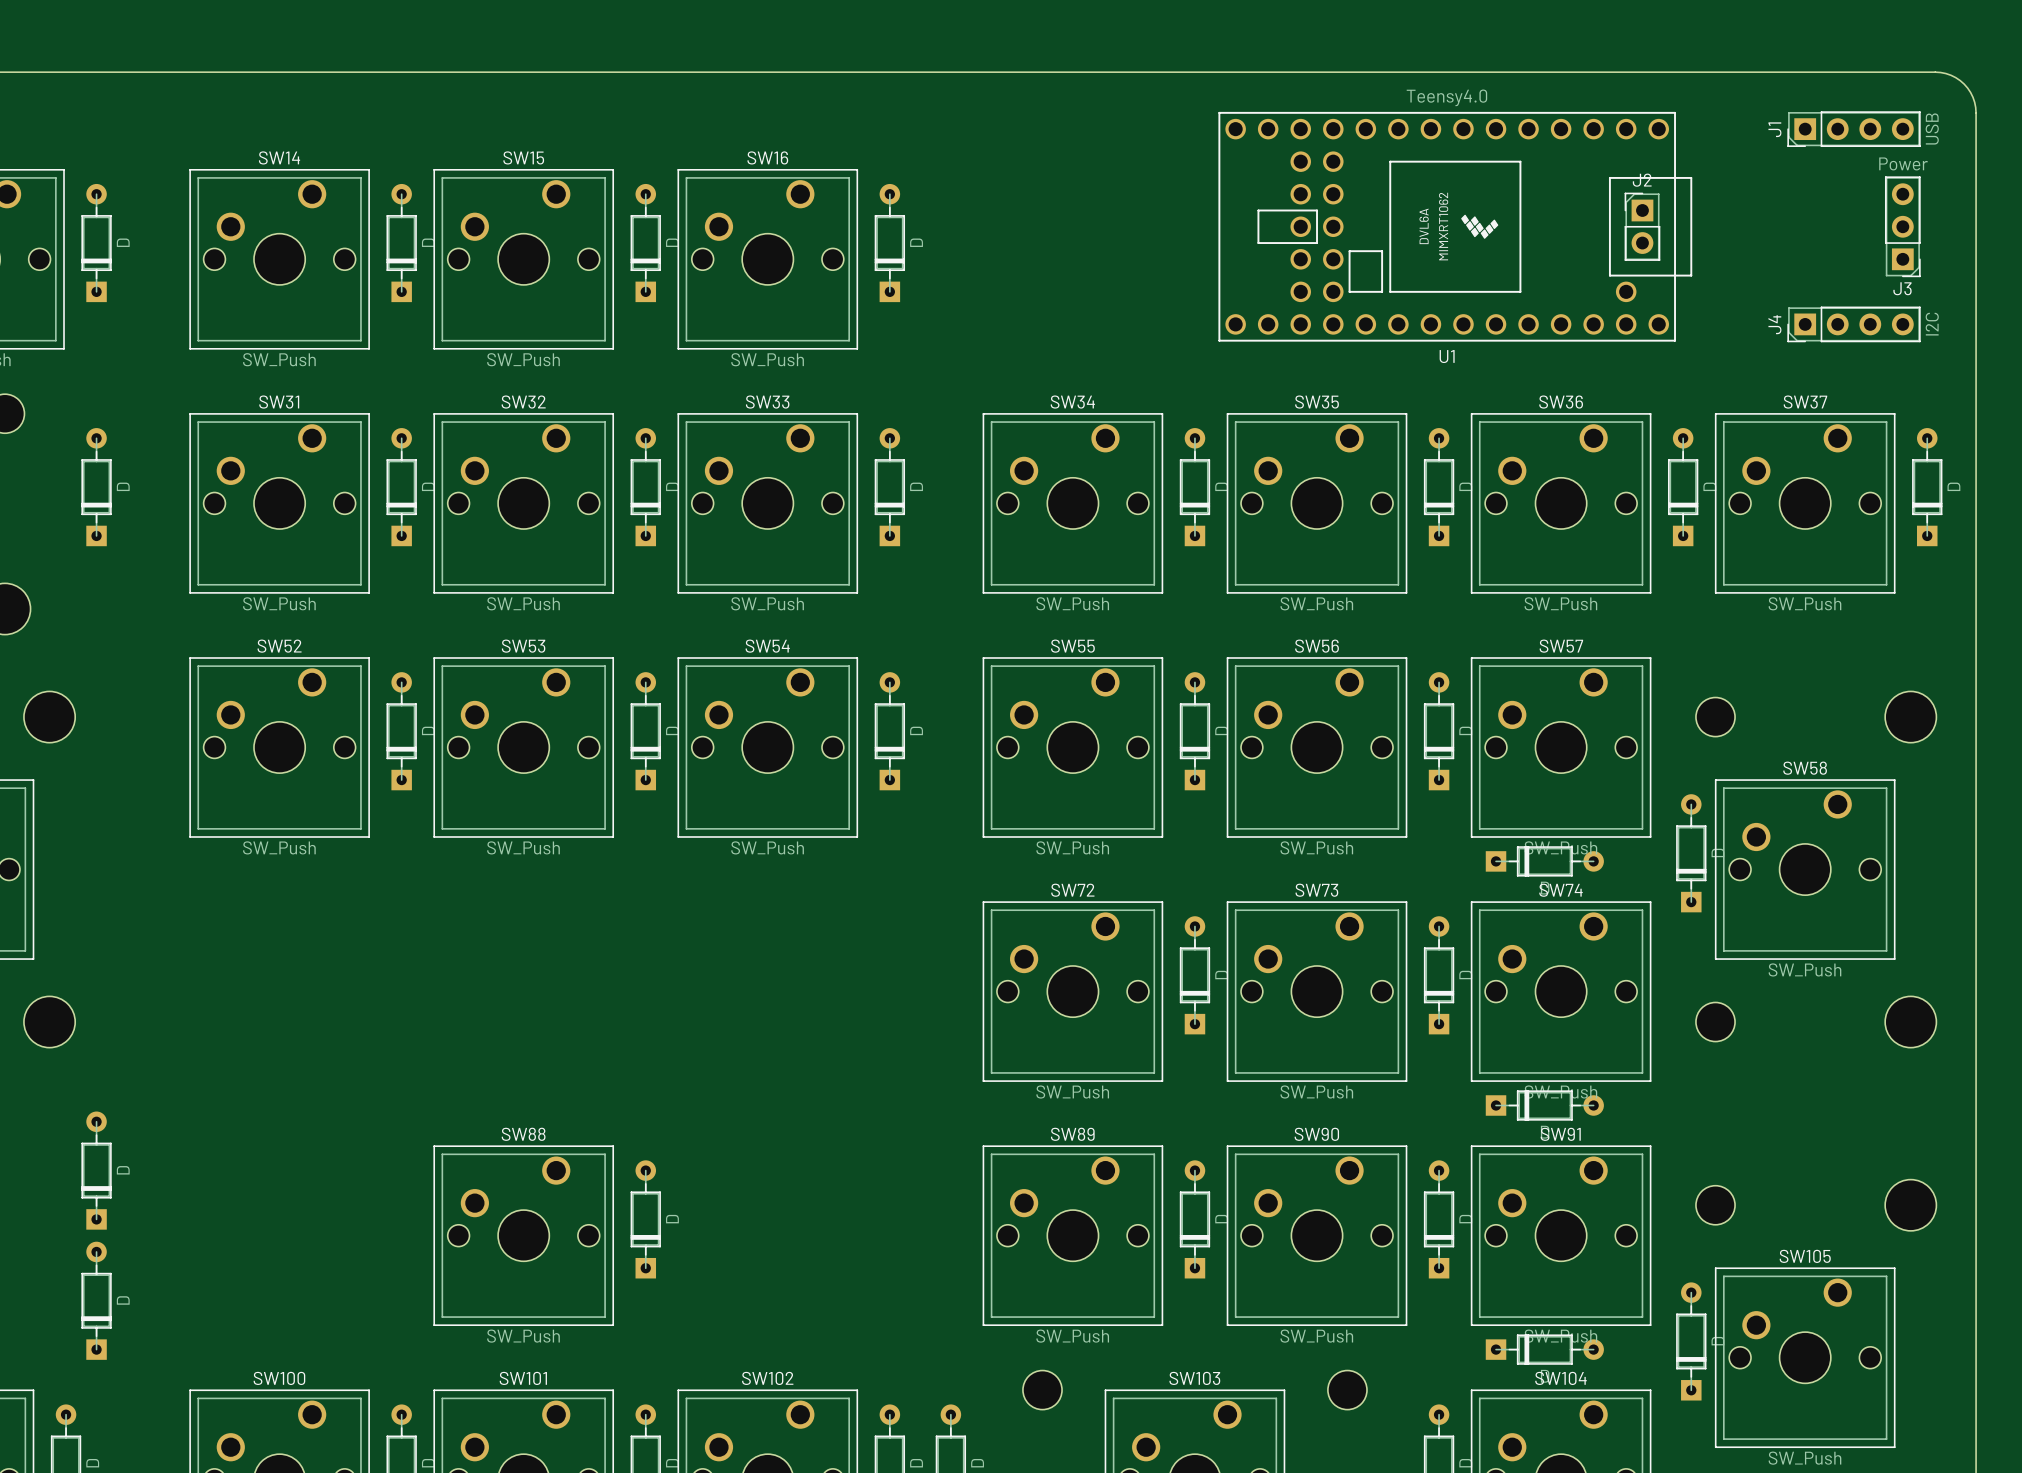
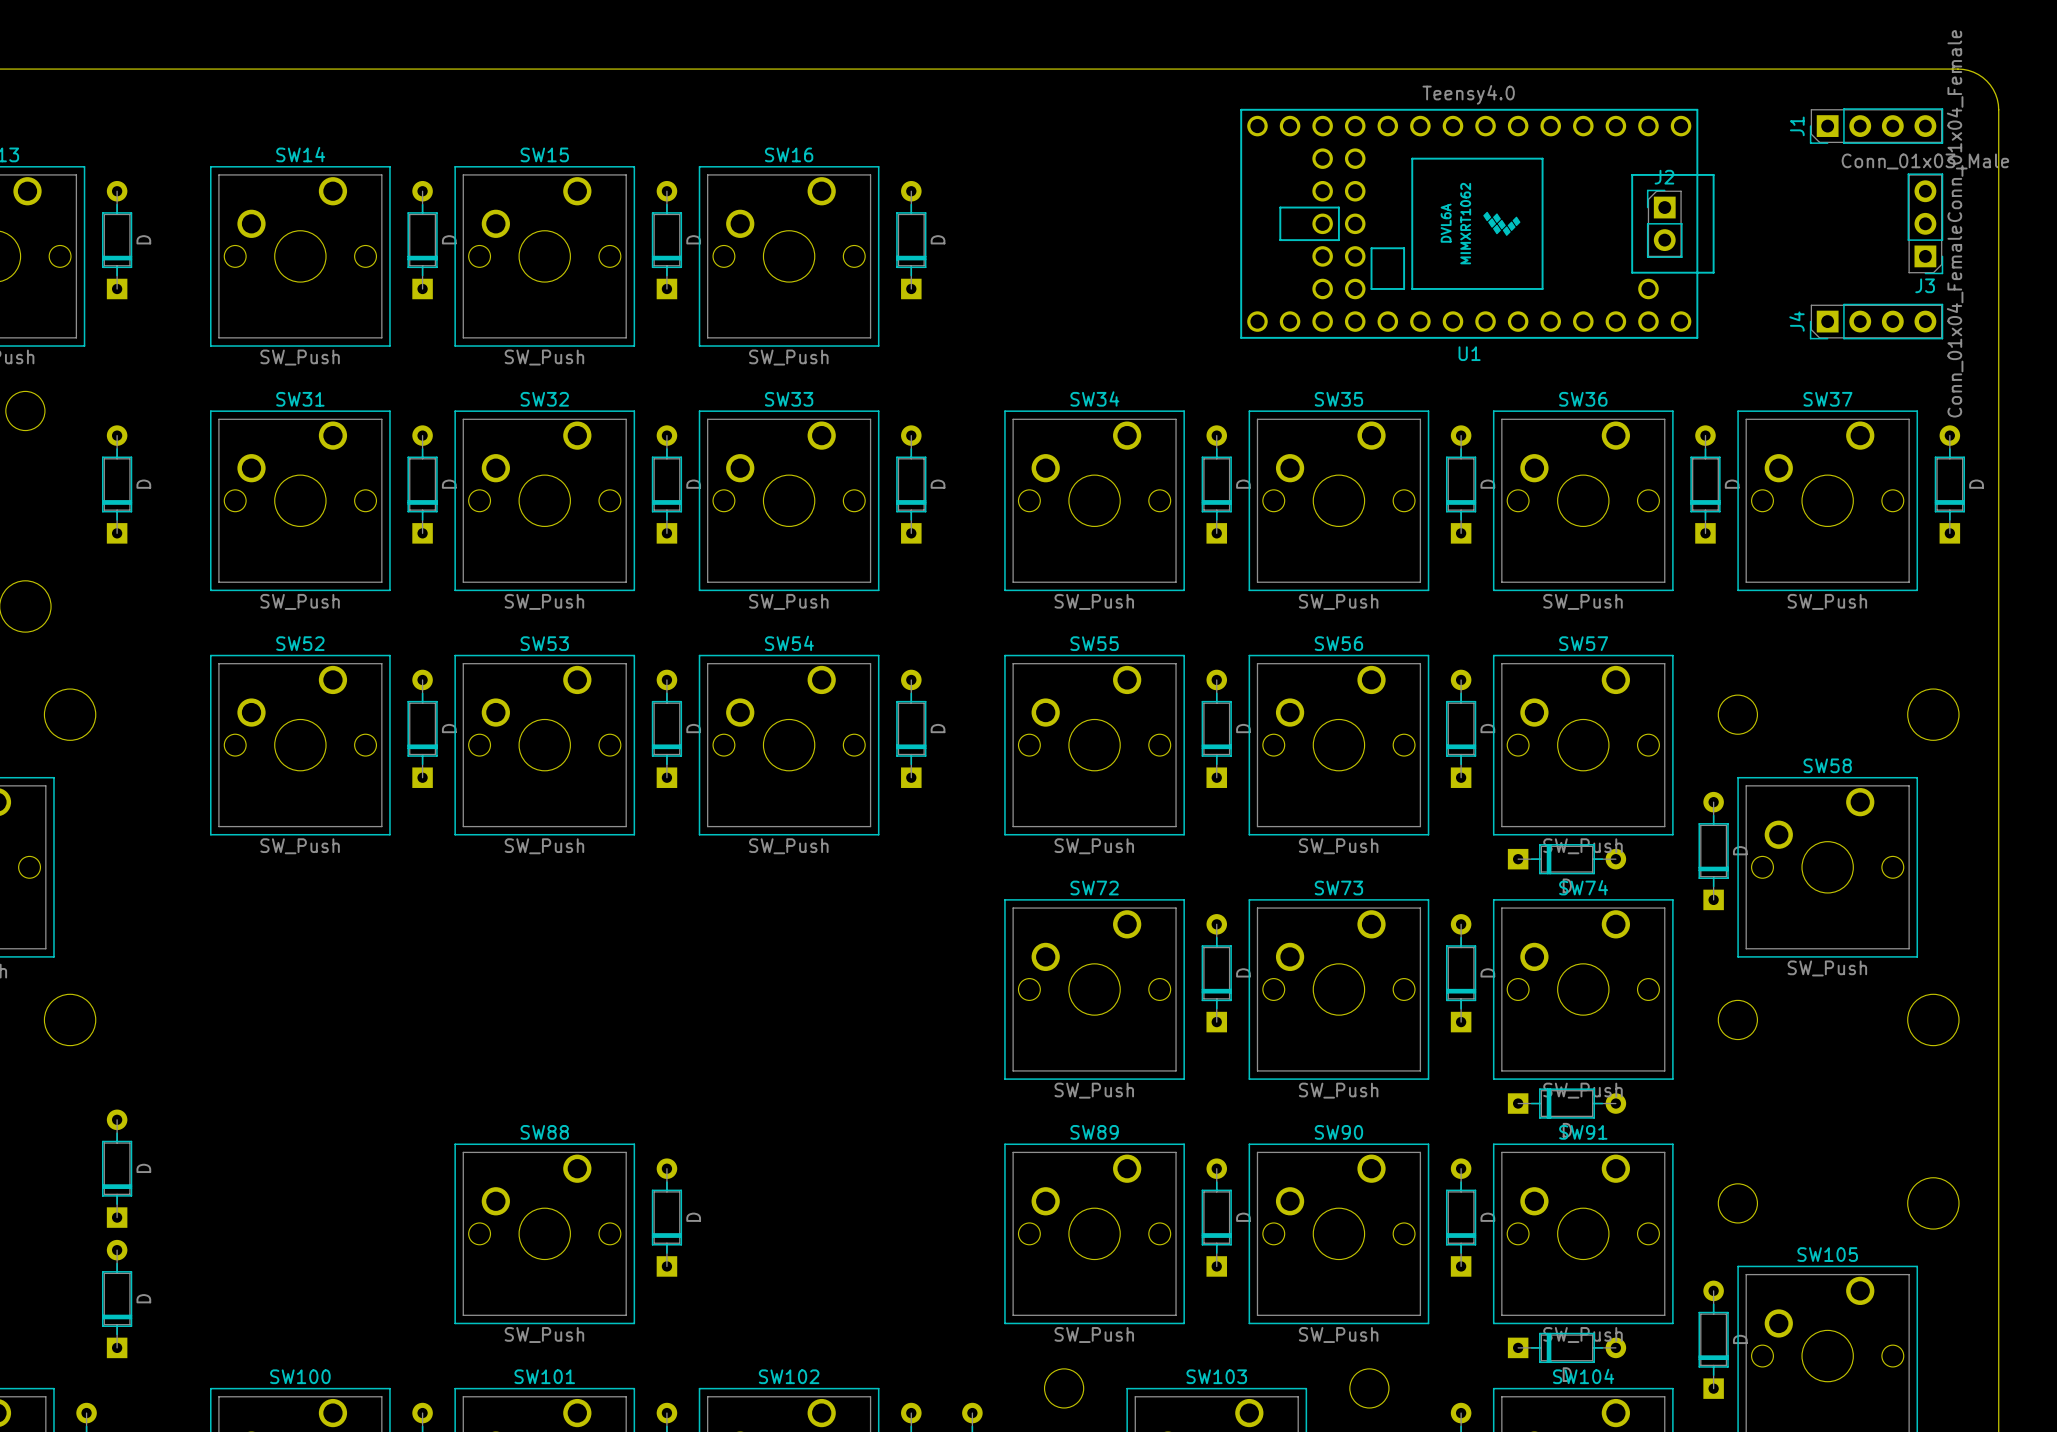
J1 value: USB (1932, 129) -> Conn_01x04_Female (1955, 126)
J3 value: Power (1903, 163) -> Conn_01x03_Male (1925, 161)
J4 value: I2C (1932, 324) -> Conn_01x04_Female (1955, 321)

